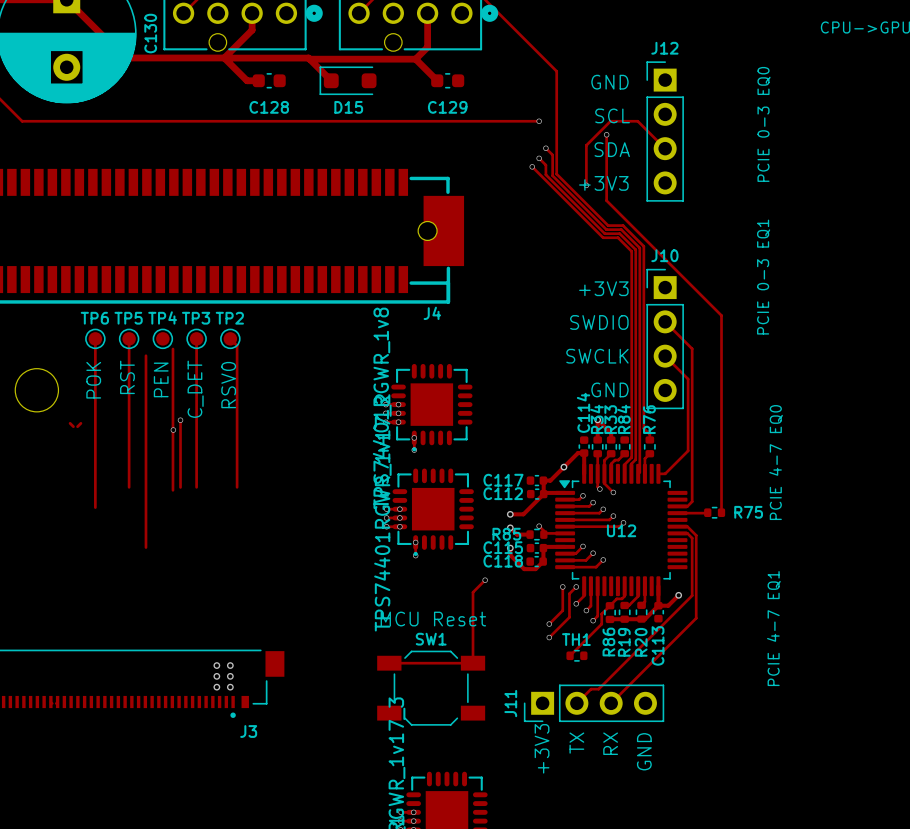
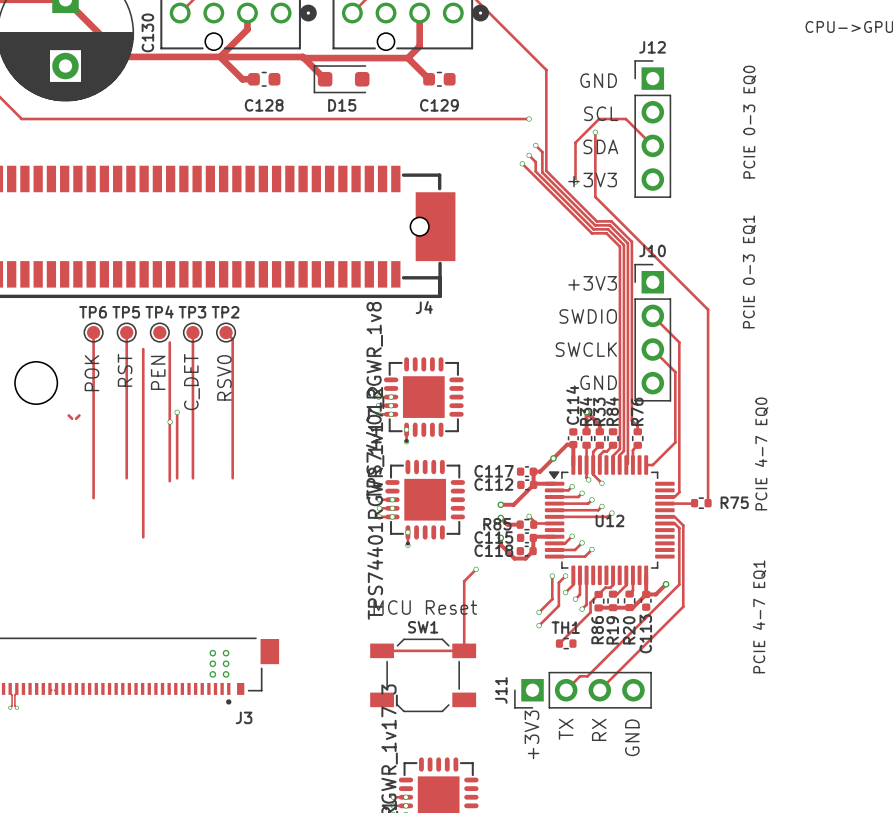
track: none -> (10, 688) (12, 695) (12, 705) (10, 707)
track: none -> (16, 688) (14, 695) (14, 705) (16, 707)
via: none -> (10, 707)
via: none -> (16, 707)

